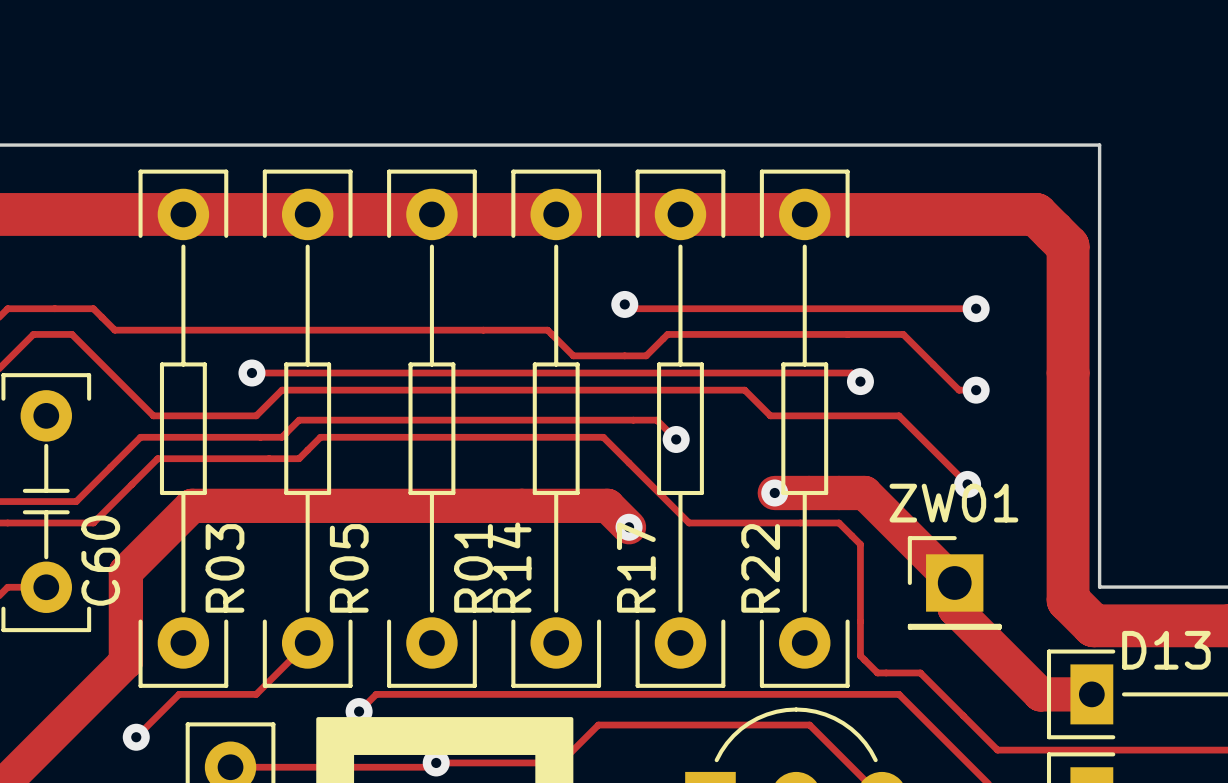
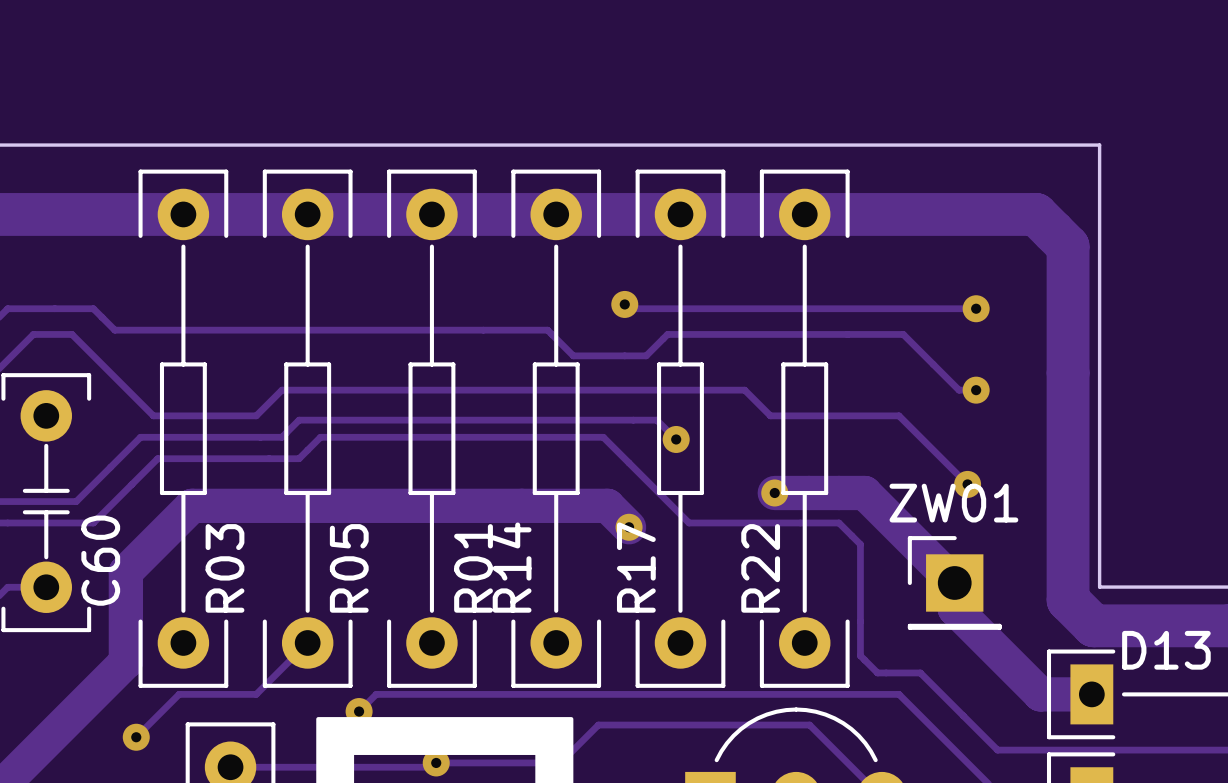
track: (251, 373) (851, 373) (860, 381) -> none
via: (251, 373) -> none
via: (860, 381) -> none

